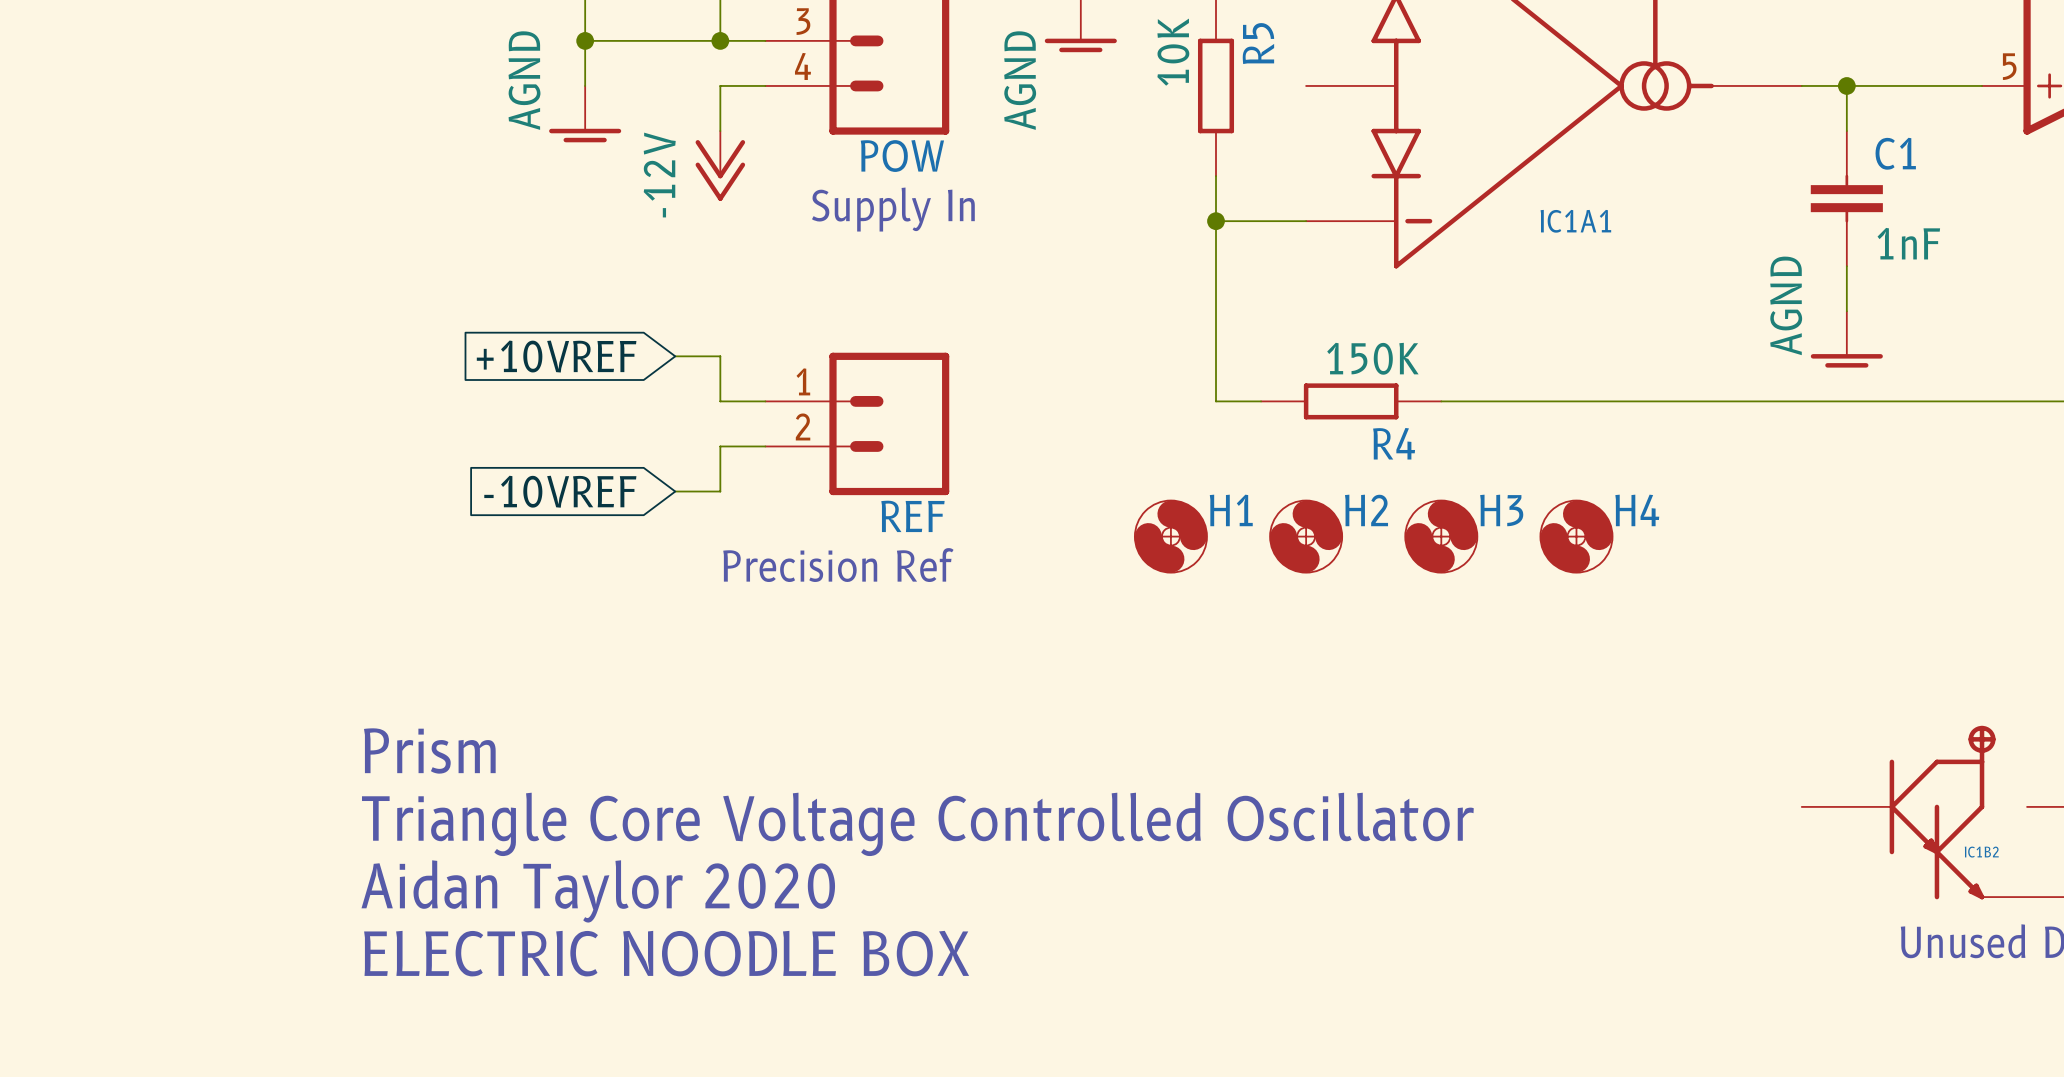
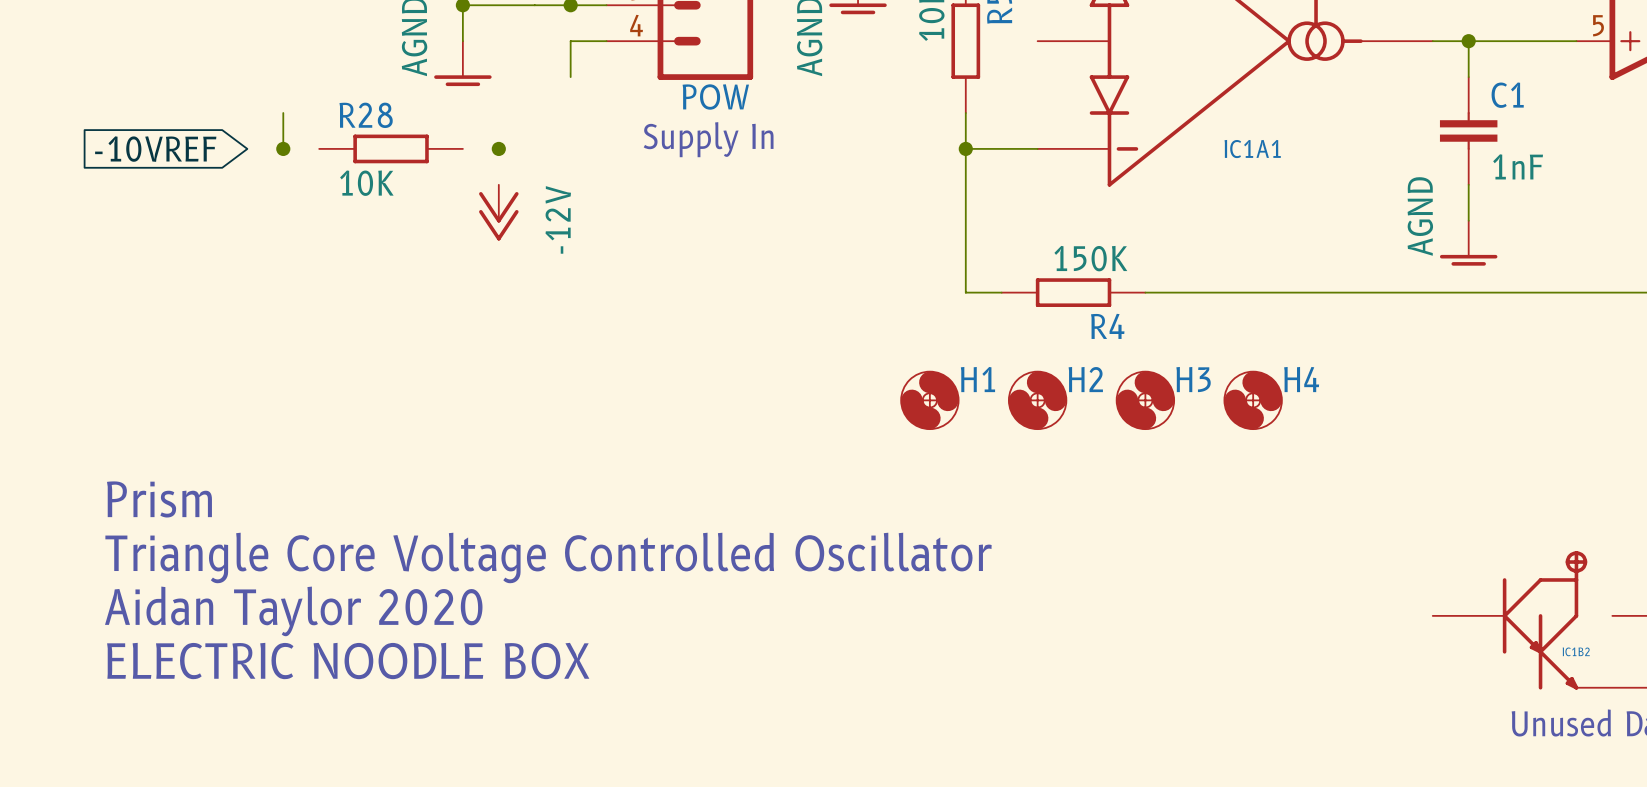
power symbol position: -12V (720, 165) -> -12V (498, 212)
power symbol text position: -12V (659, 175) -> -12V (558, 219)
wire: none -> (283, 113) (283, 148)
global label: none -> -10VREF (155, 149)
junction: none -> (283, 148)
R28: none -> 10K (391, 148)
junction: none -> (498, 148)
global label: +10VREF (556, 356) -> none
wire: (675, 356) (720, 356) (720, 401) (765, 401) -> none
REF: (857, 423) -> none
wire: (765, 446) (720, 446) (720, 491) (675, 491) -> none
global label: -10VREF (560, 491) -> none
text: Precision Ref (838, 565) -> none
text position: Prism (429, 750) -> Prism (159, 499)
text position: Triangle Core Voltage Controlled Oscillator (917, 824) -> Triangle Core Voltage Controlled Oscillator (548, 557)
text position: Aidan Taylor 2020 (598, 891) -> Aidan Taylor 2020 (293, 611)
text position: ELECTRIC NOODLE BOX (666, 953) -> ELECTRIC NOODLE BOX (348, 661)

